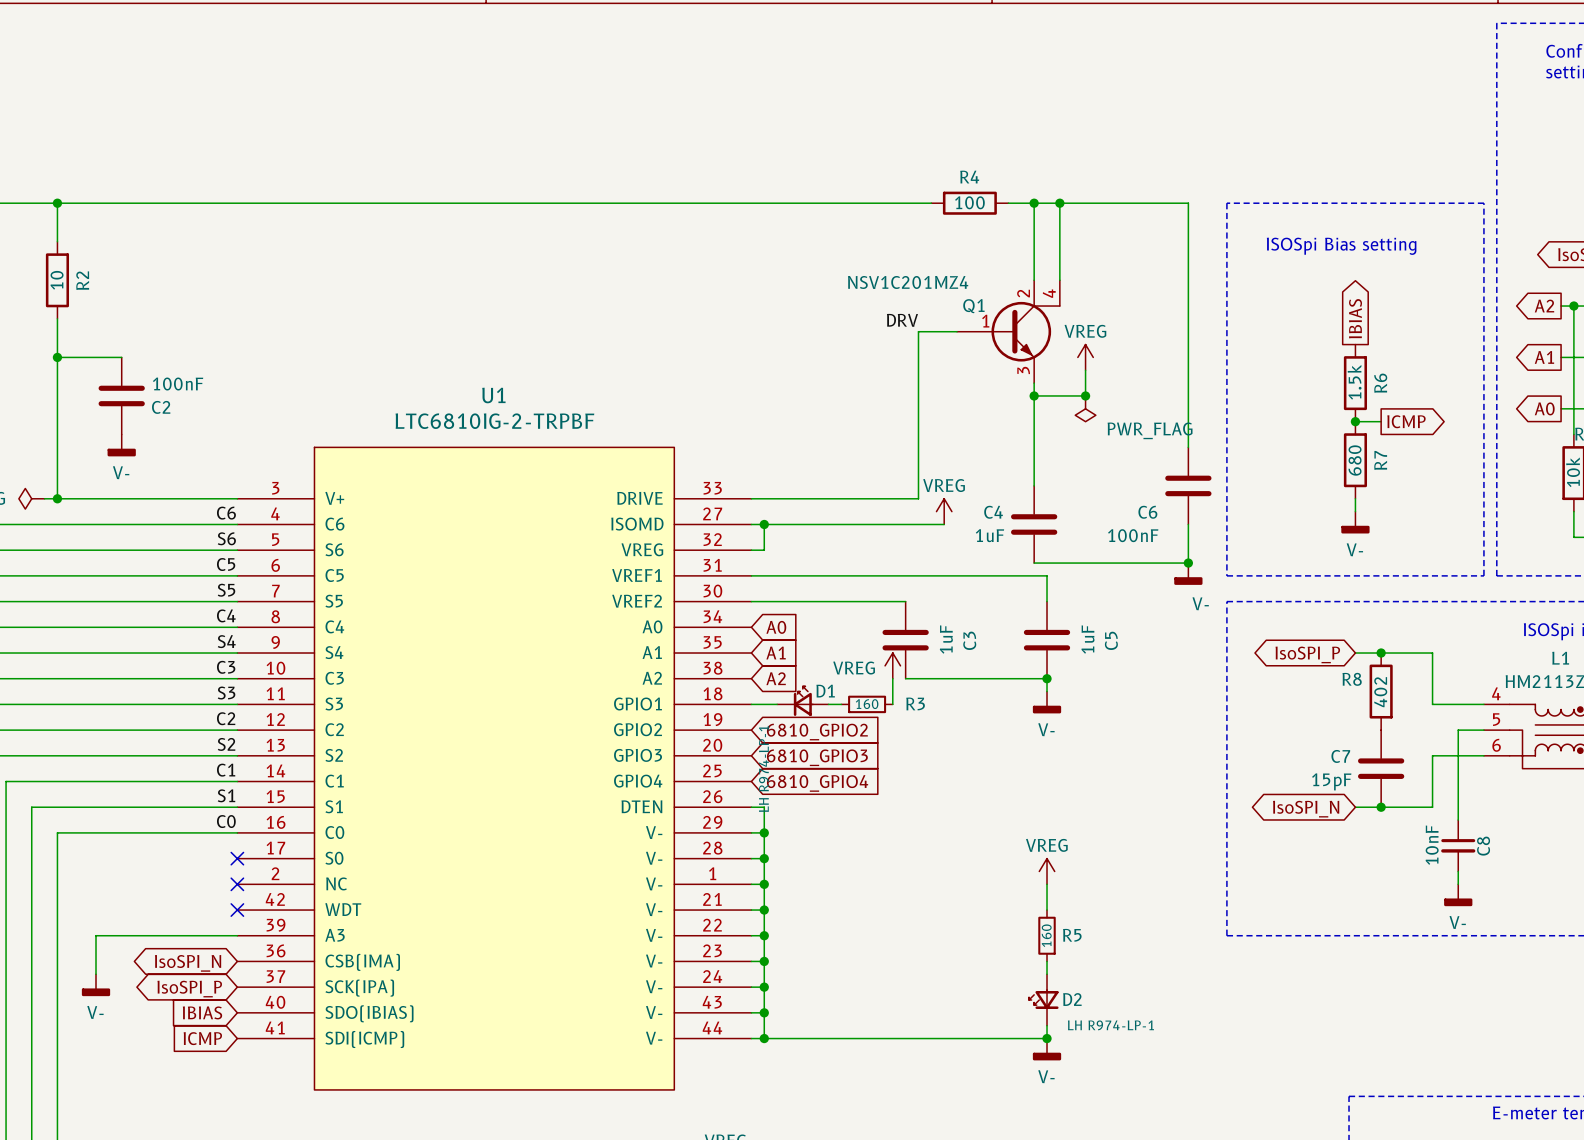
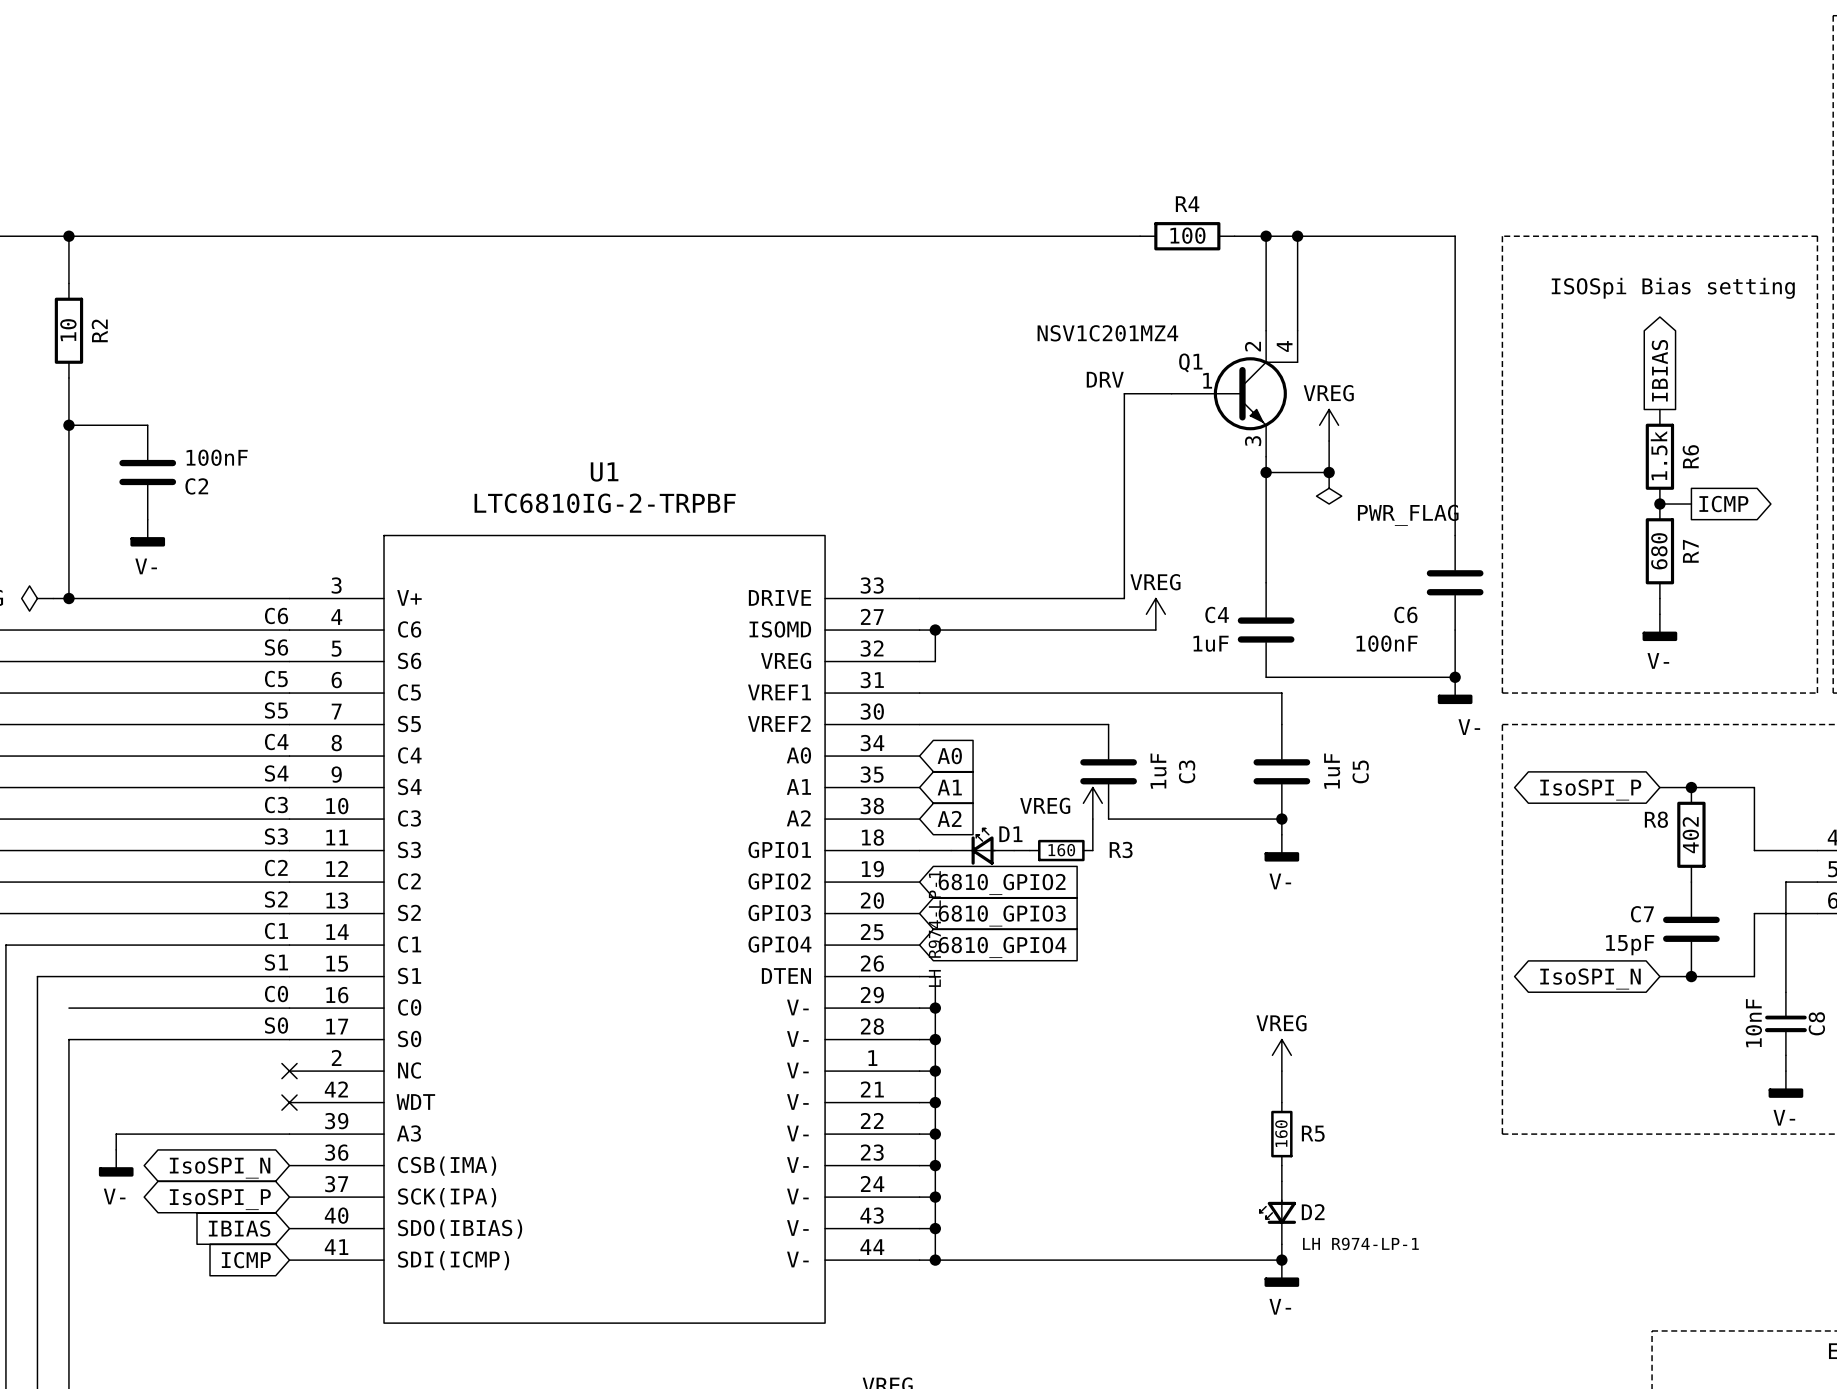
wire: (57, 832) (57, 858) -> (289, 1039) (68, 1039)
label: none -> S0 (276, 1025)
no-connect mark: (237, 858) -> none
power symbol position: V- (96, 985) -> V- (116, 1163)

